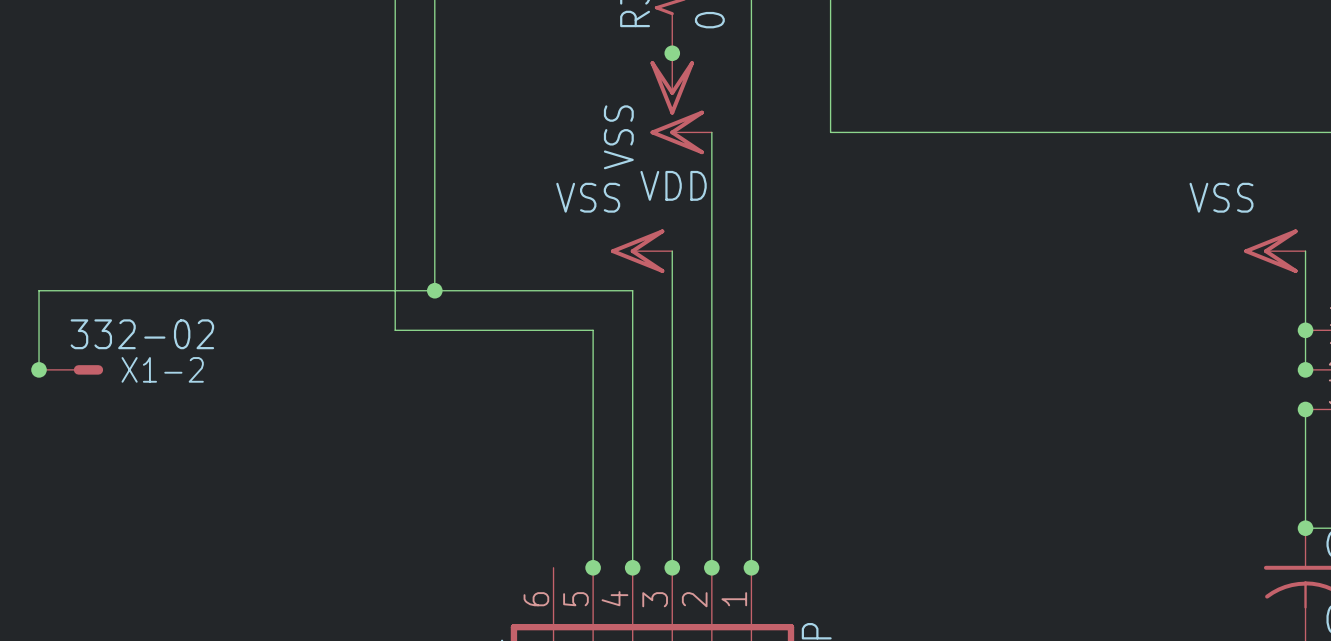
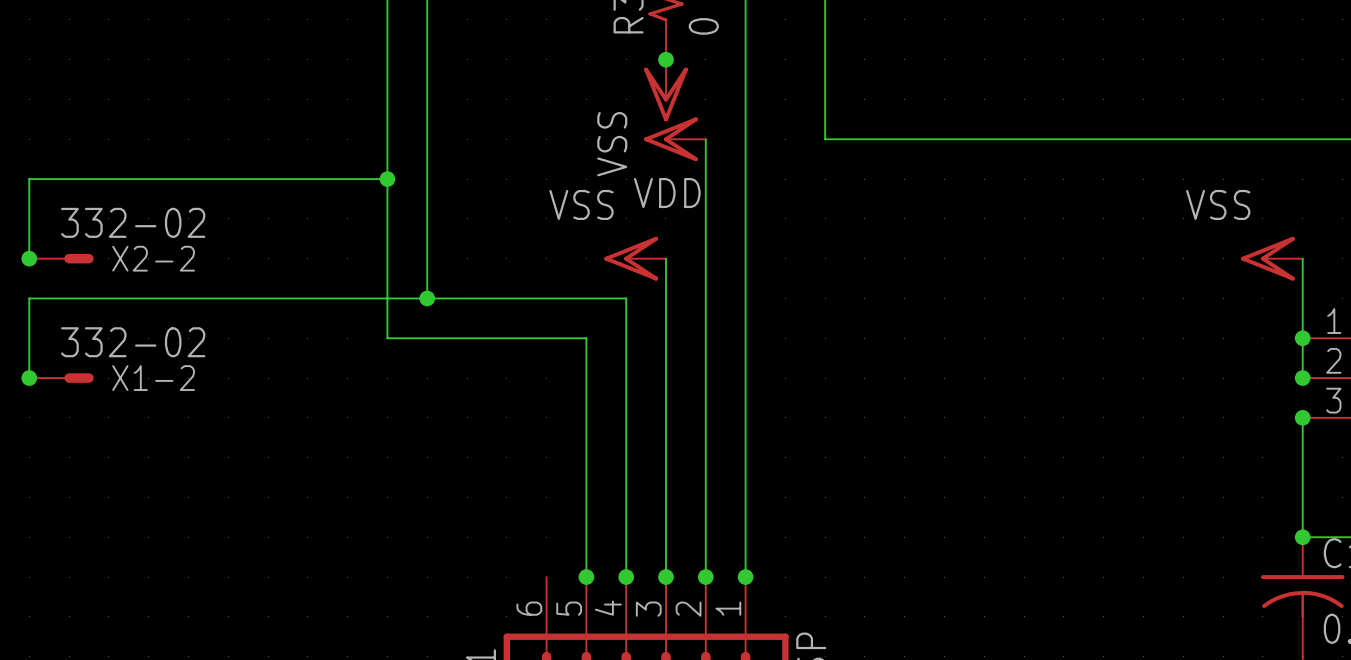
wire: none -> (387, 179) (29, 179) (29, 258)
junction: none -> (387, 179)
junction: none -> (29, 258)
X2-2: none -> 332-02 (61, 258)

